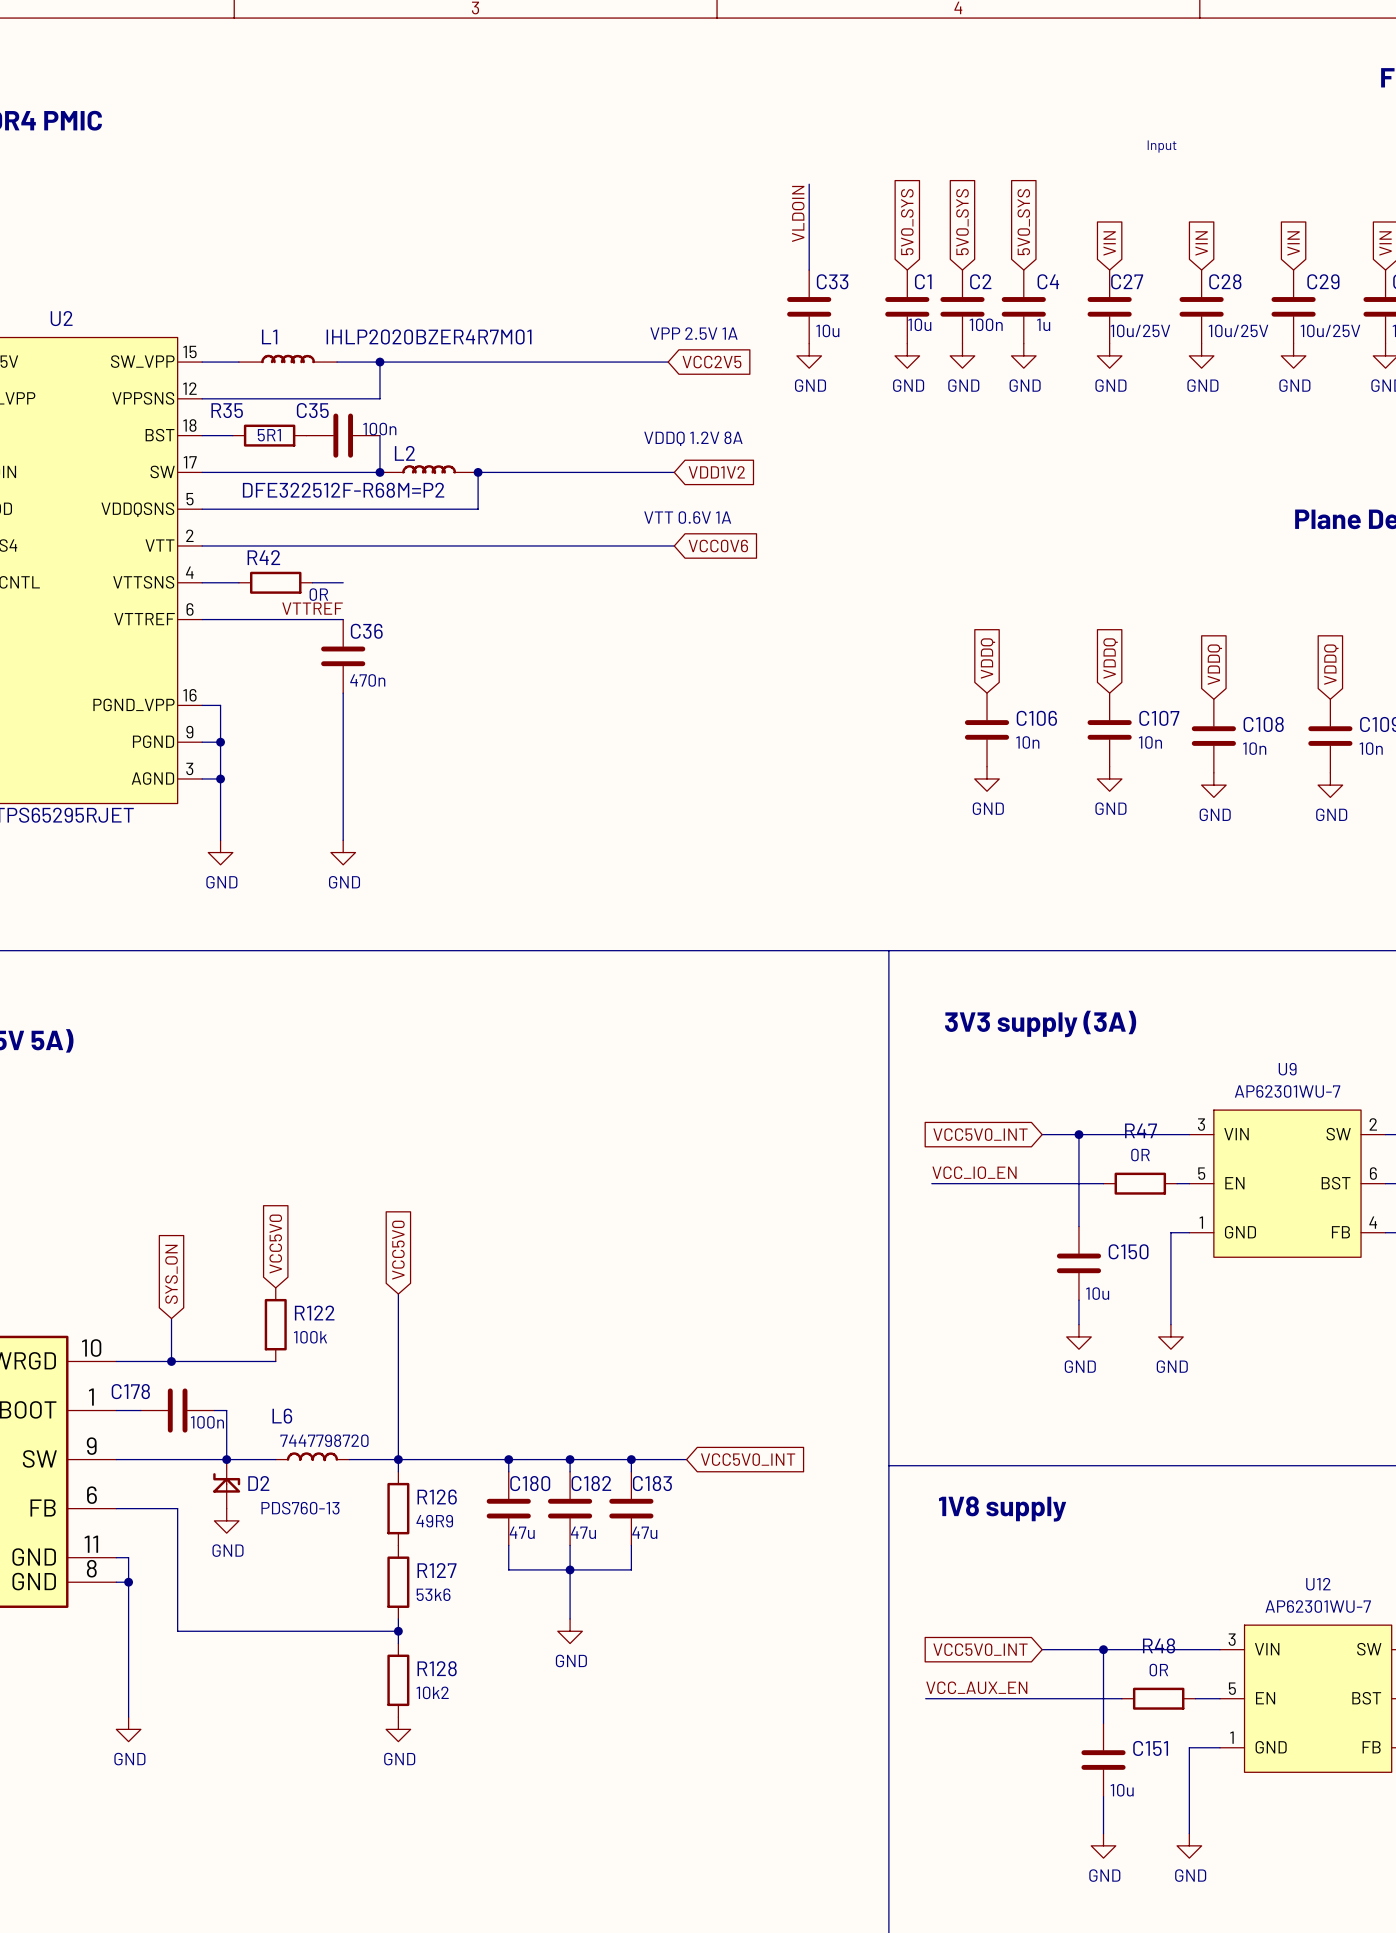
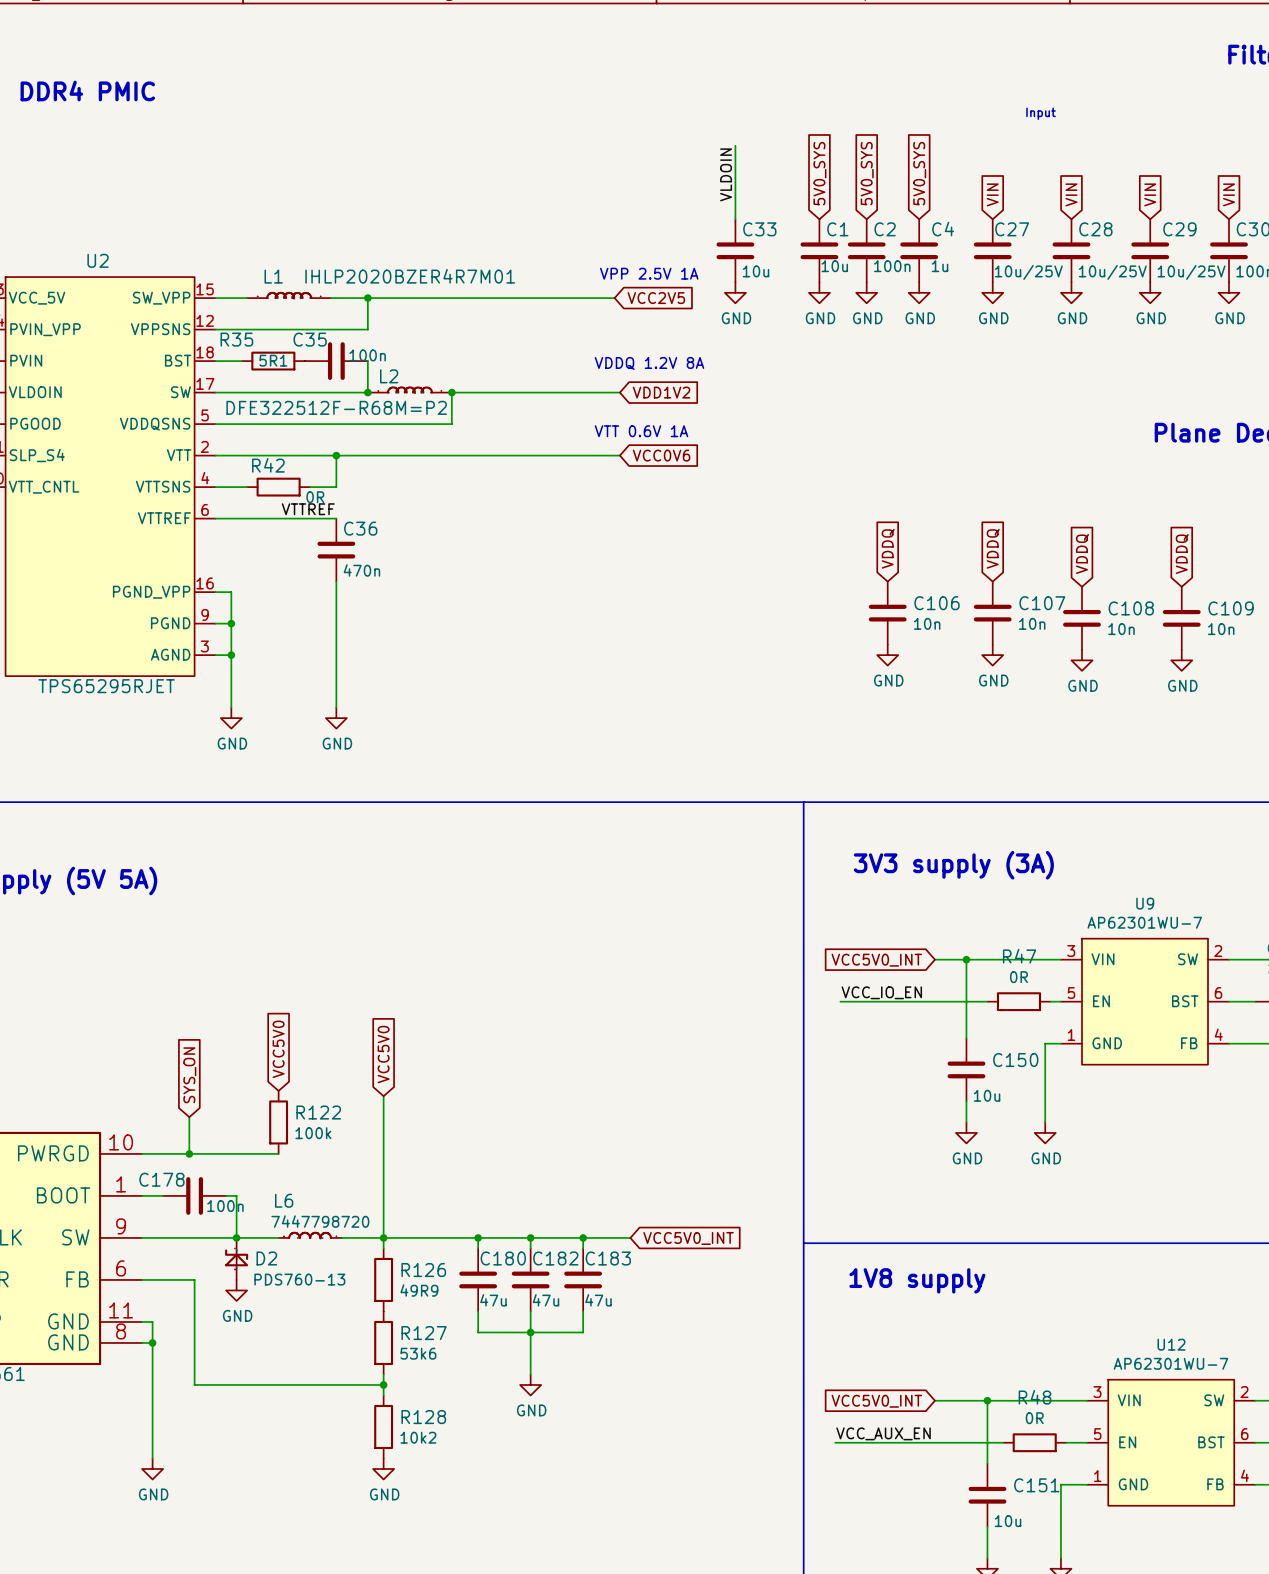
wire: none -> (336, 455) (336, 487)
junction: none -> (336, 455)

